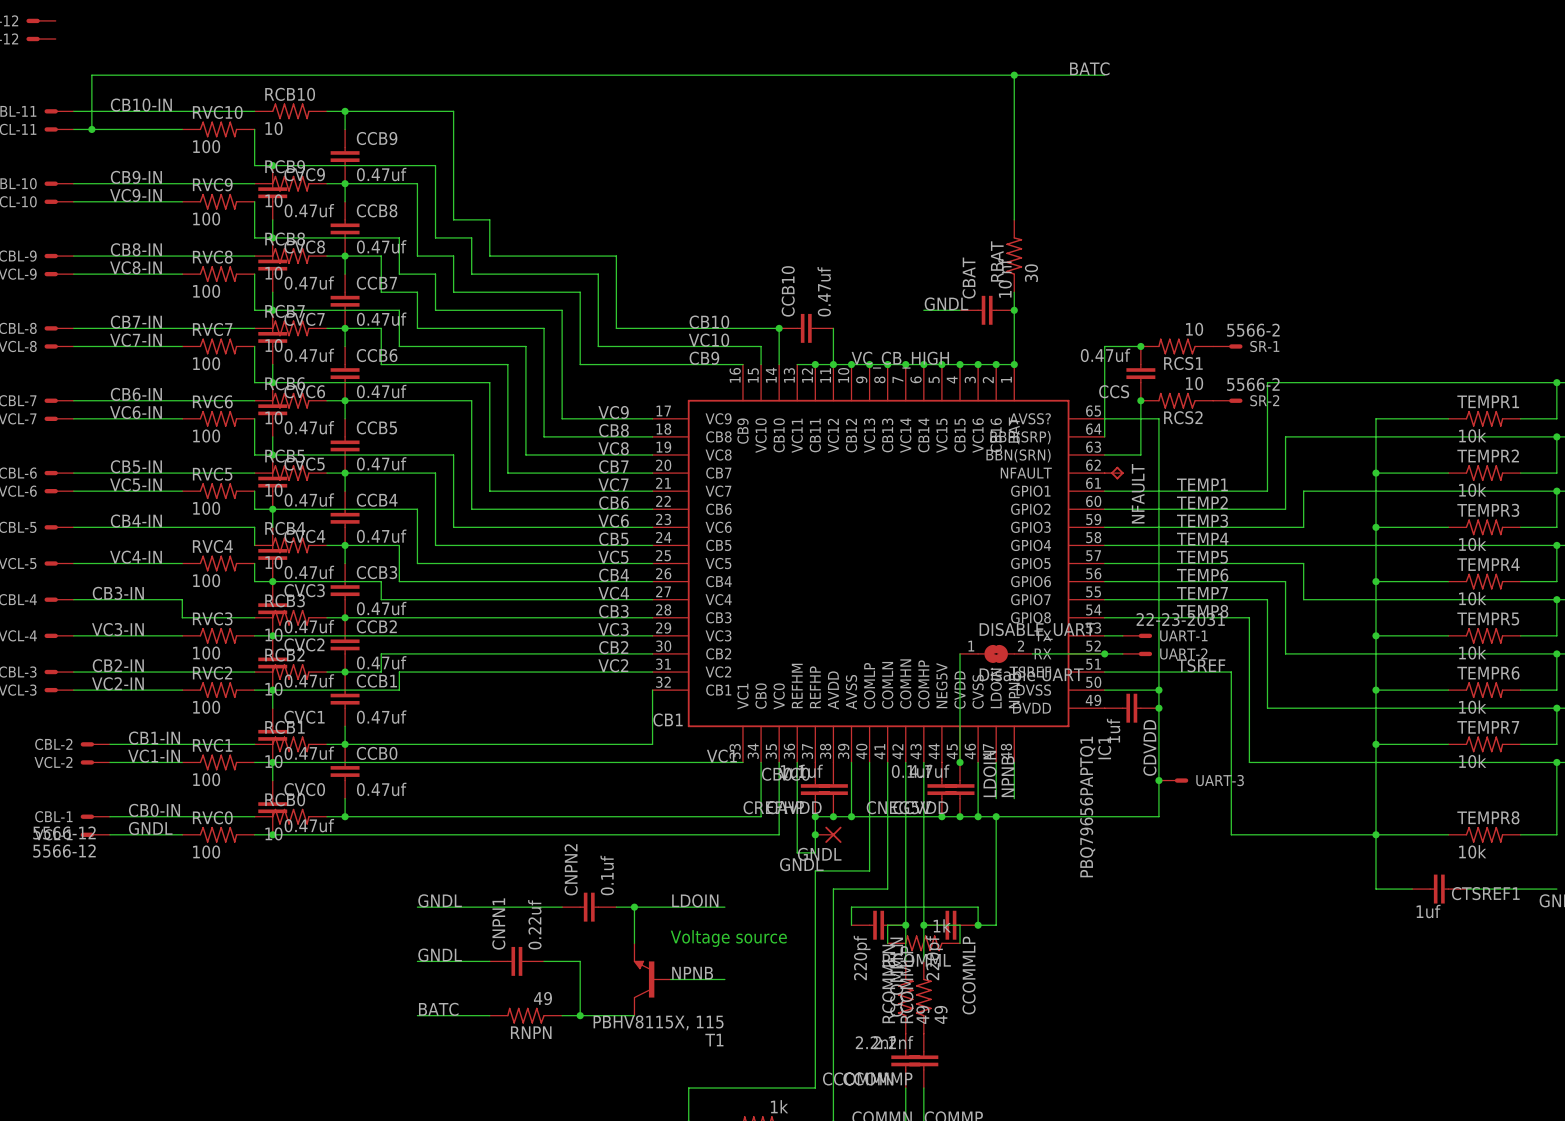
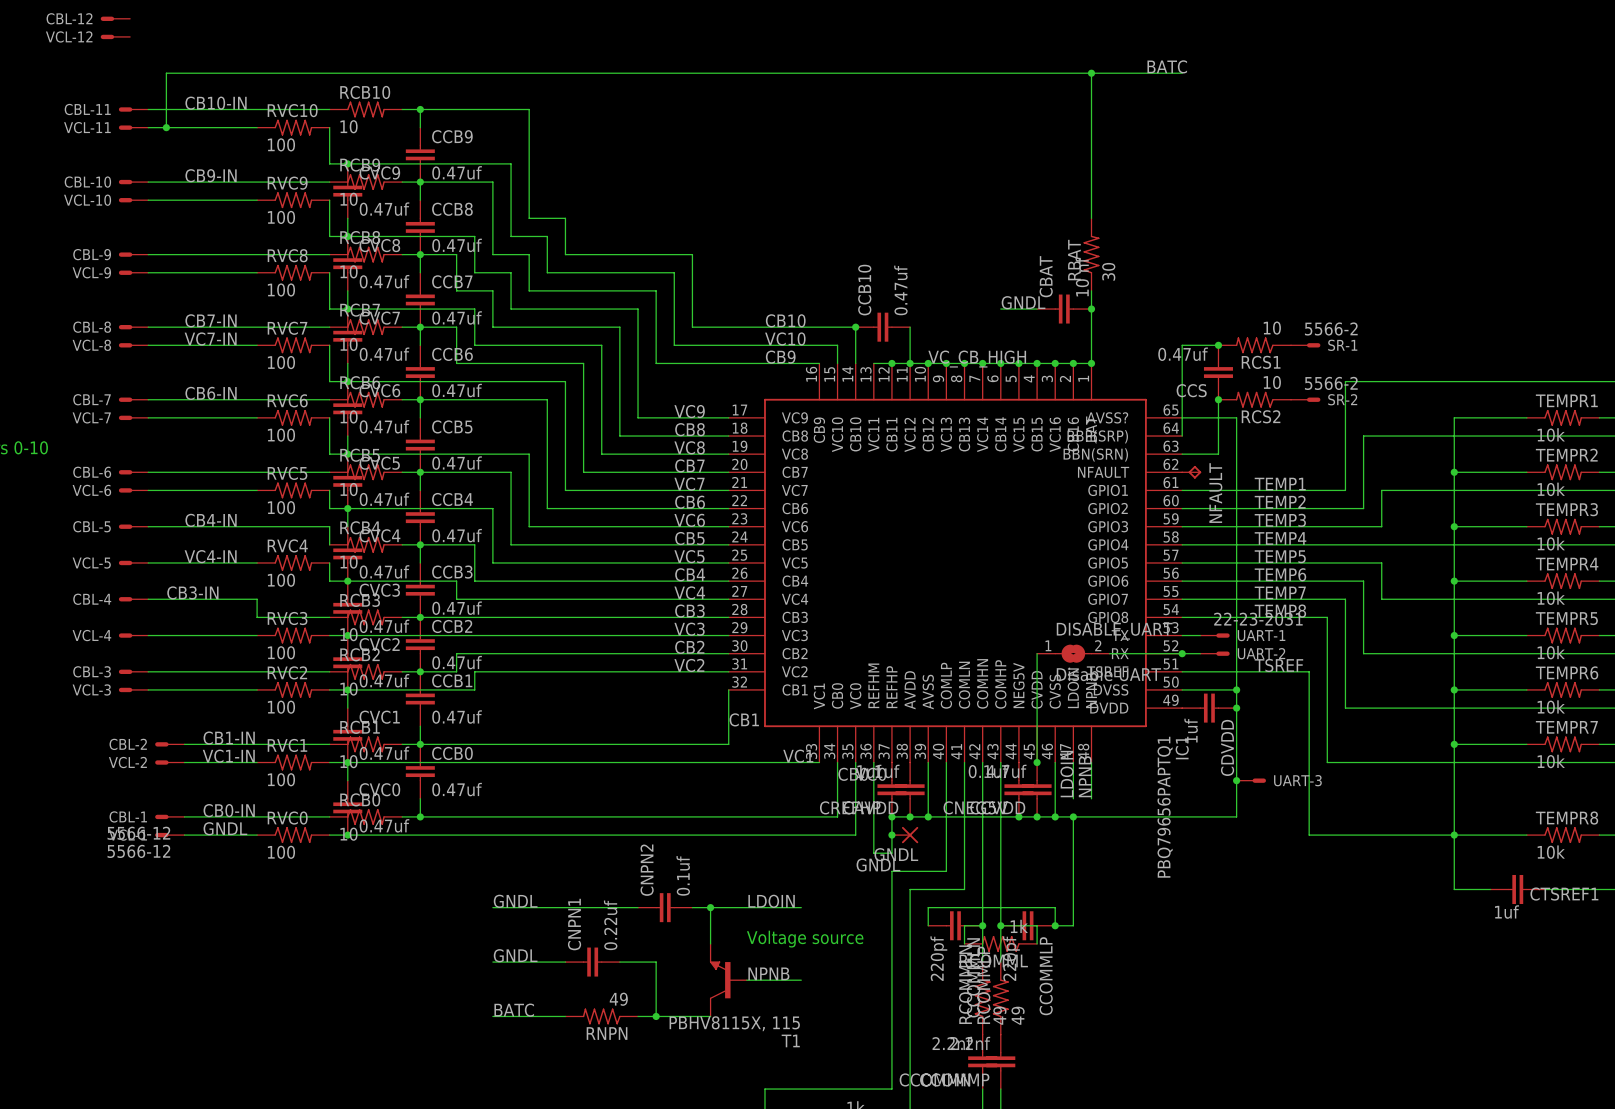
label: VC9-IN (136, 195) -> none
label: CB8-IN (136, 249) -> none
label: VC8-IN (136, 267) -> none
label: VC6-IN (136, 412) -> none
label: CB5-IN (136, 466) -> none
label: VC5-IN (136, 484) -> none
label: VC3-IN (117, 629) -> none
label: CB2-IN (118, 665) -> none
label: VC2-IN (117, 683) -> none

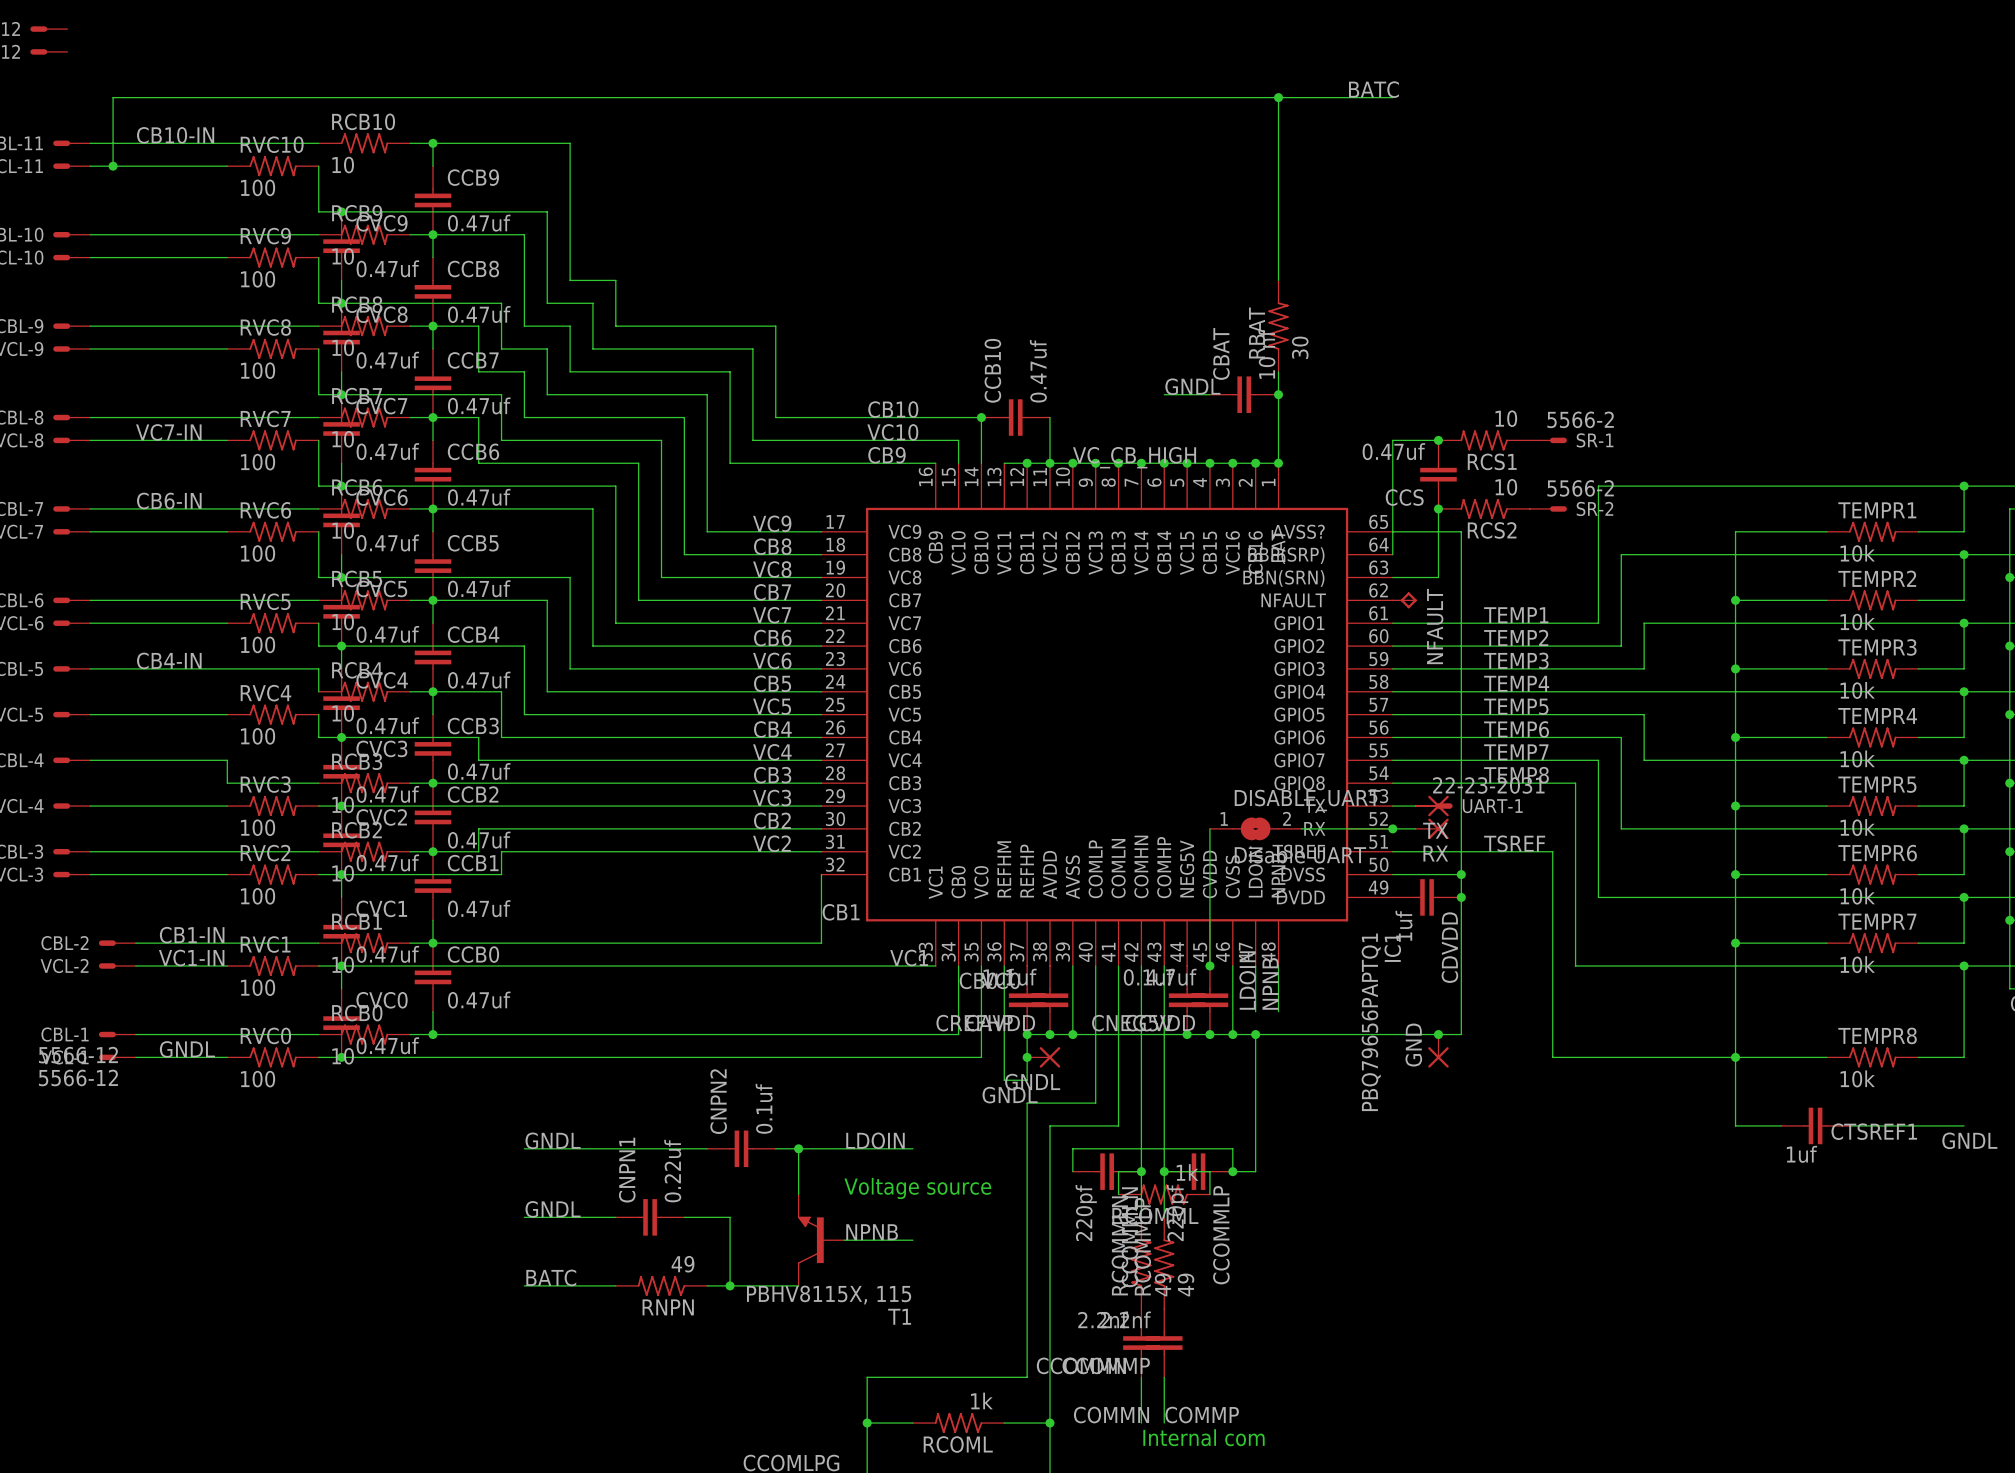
label: CB9-IN (211, 175) -> none
label: CB7-IN (211, 320) -> none
label: VC4-IN (210, 556) -> none
label: CB3-IN (192, 592) -> none
TX: none -> (1432, 806)
RX: none -> (1432, 828)
UART-2: (1215, 653) -> none
junction position: (1236, 780) -> (1438, 1034)
UART-3: (1251, 780) -> none
label: CB0-IN (229, 810) -> none
GND: none -> (1438, 1051)

